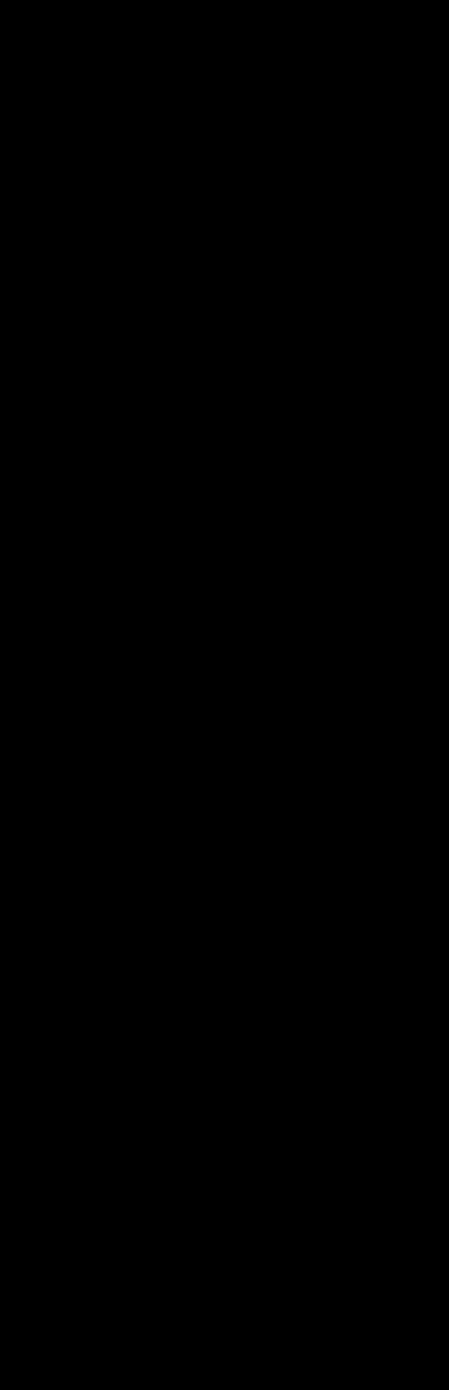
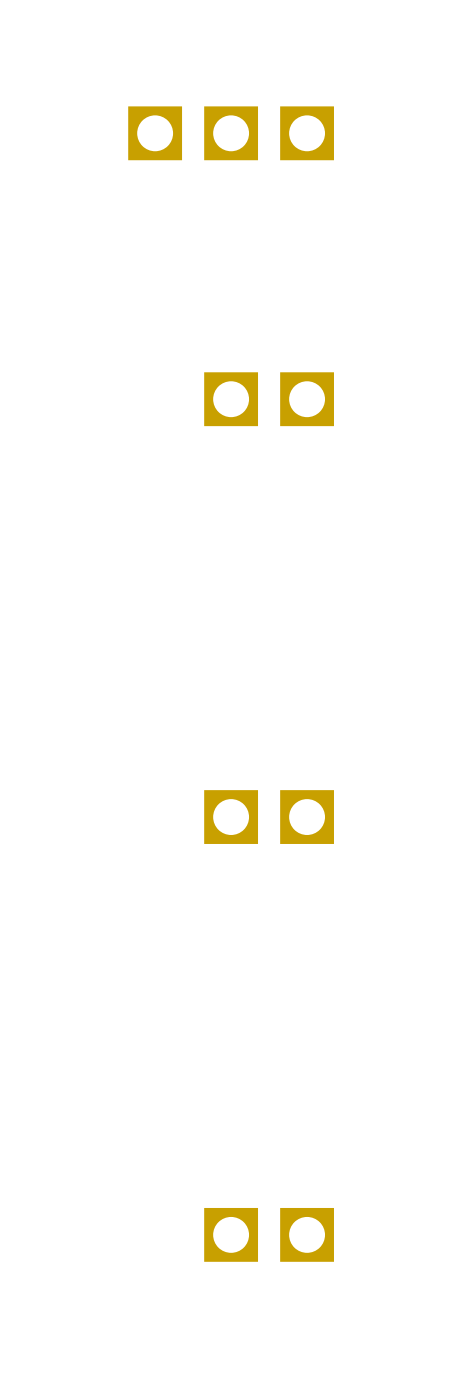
part: none -> (231, 133)
part: none -> (269, 399)
part: none -> (269, 817)
part: none -> (269, 1234)

